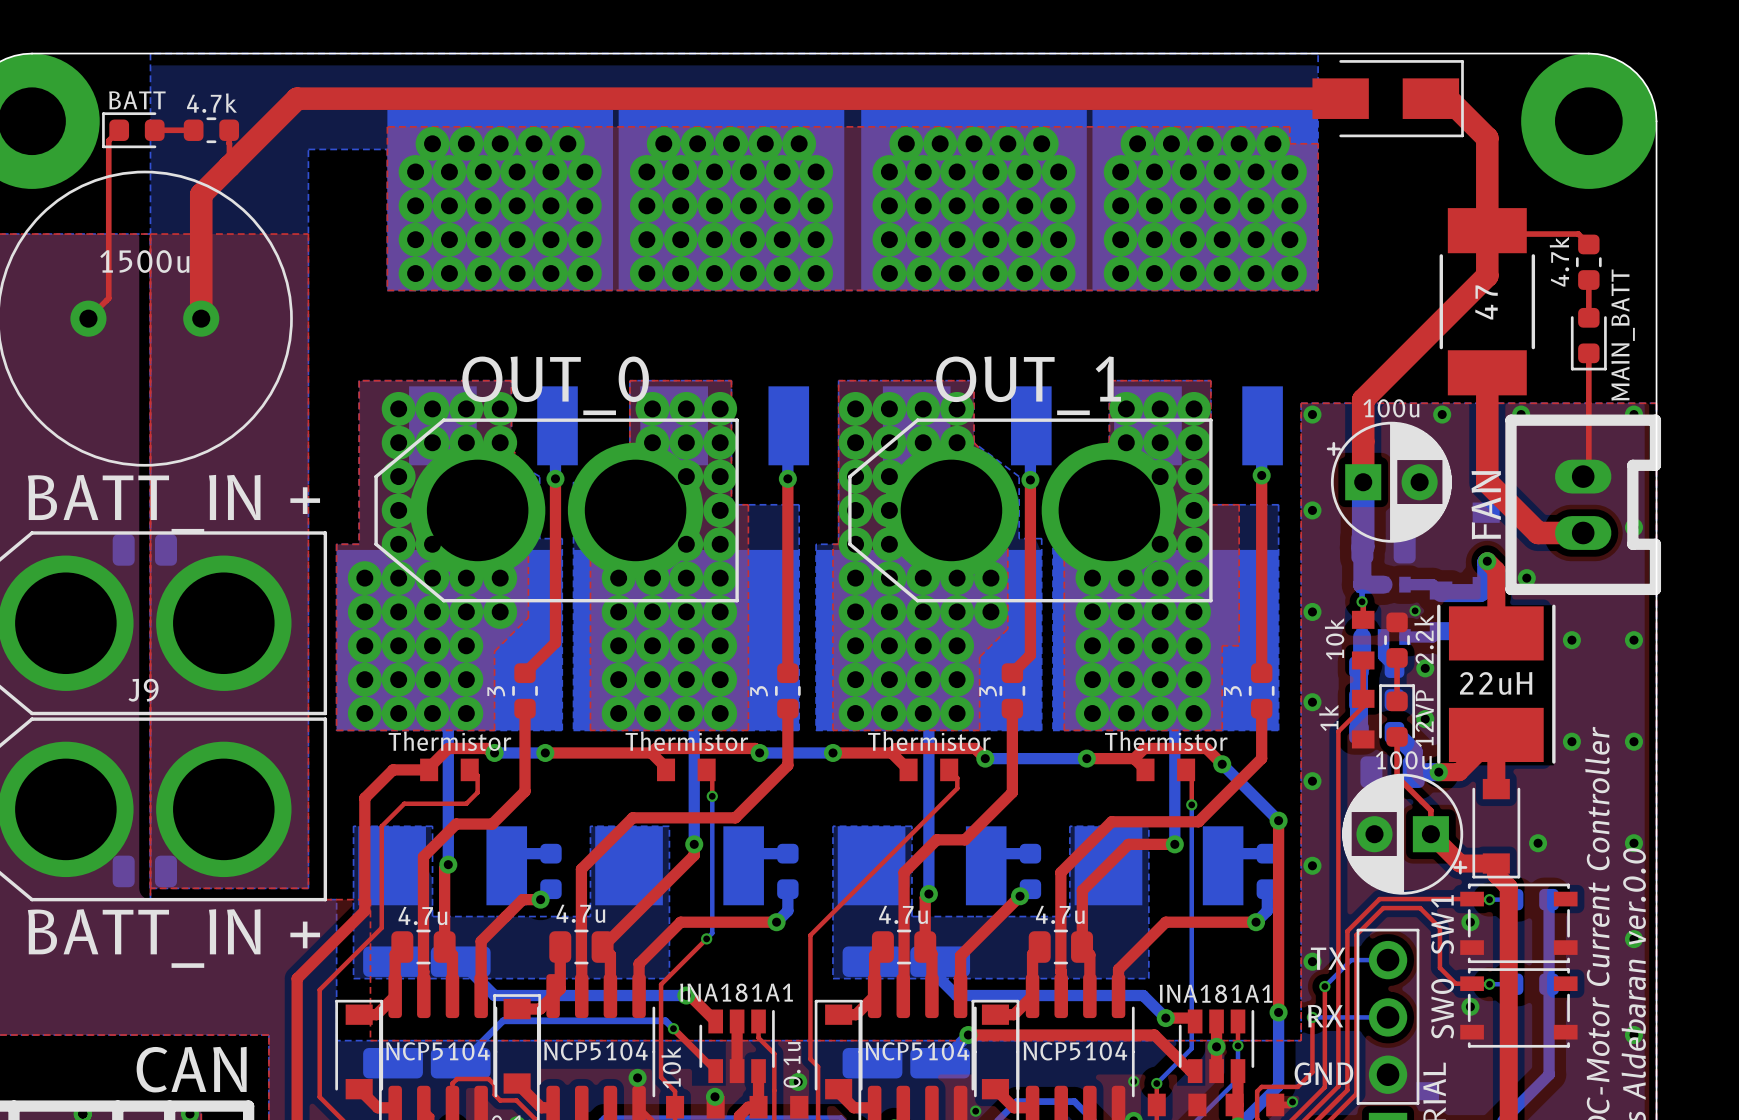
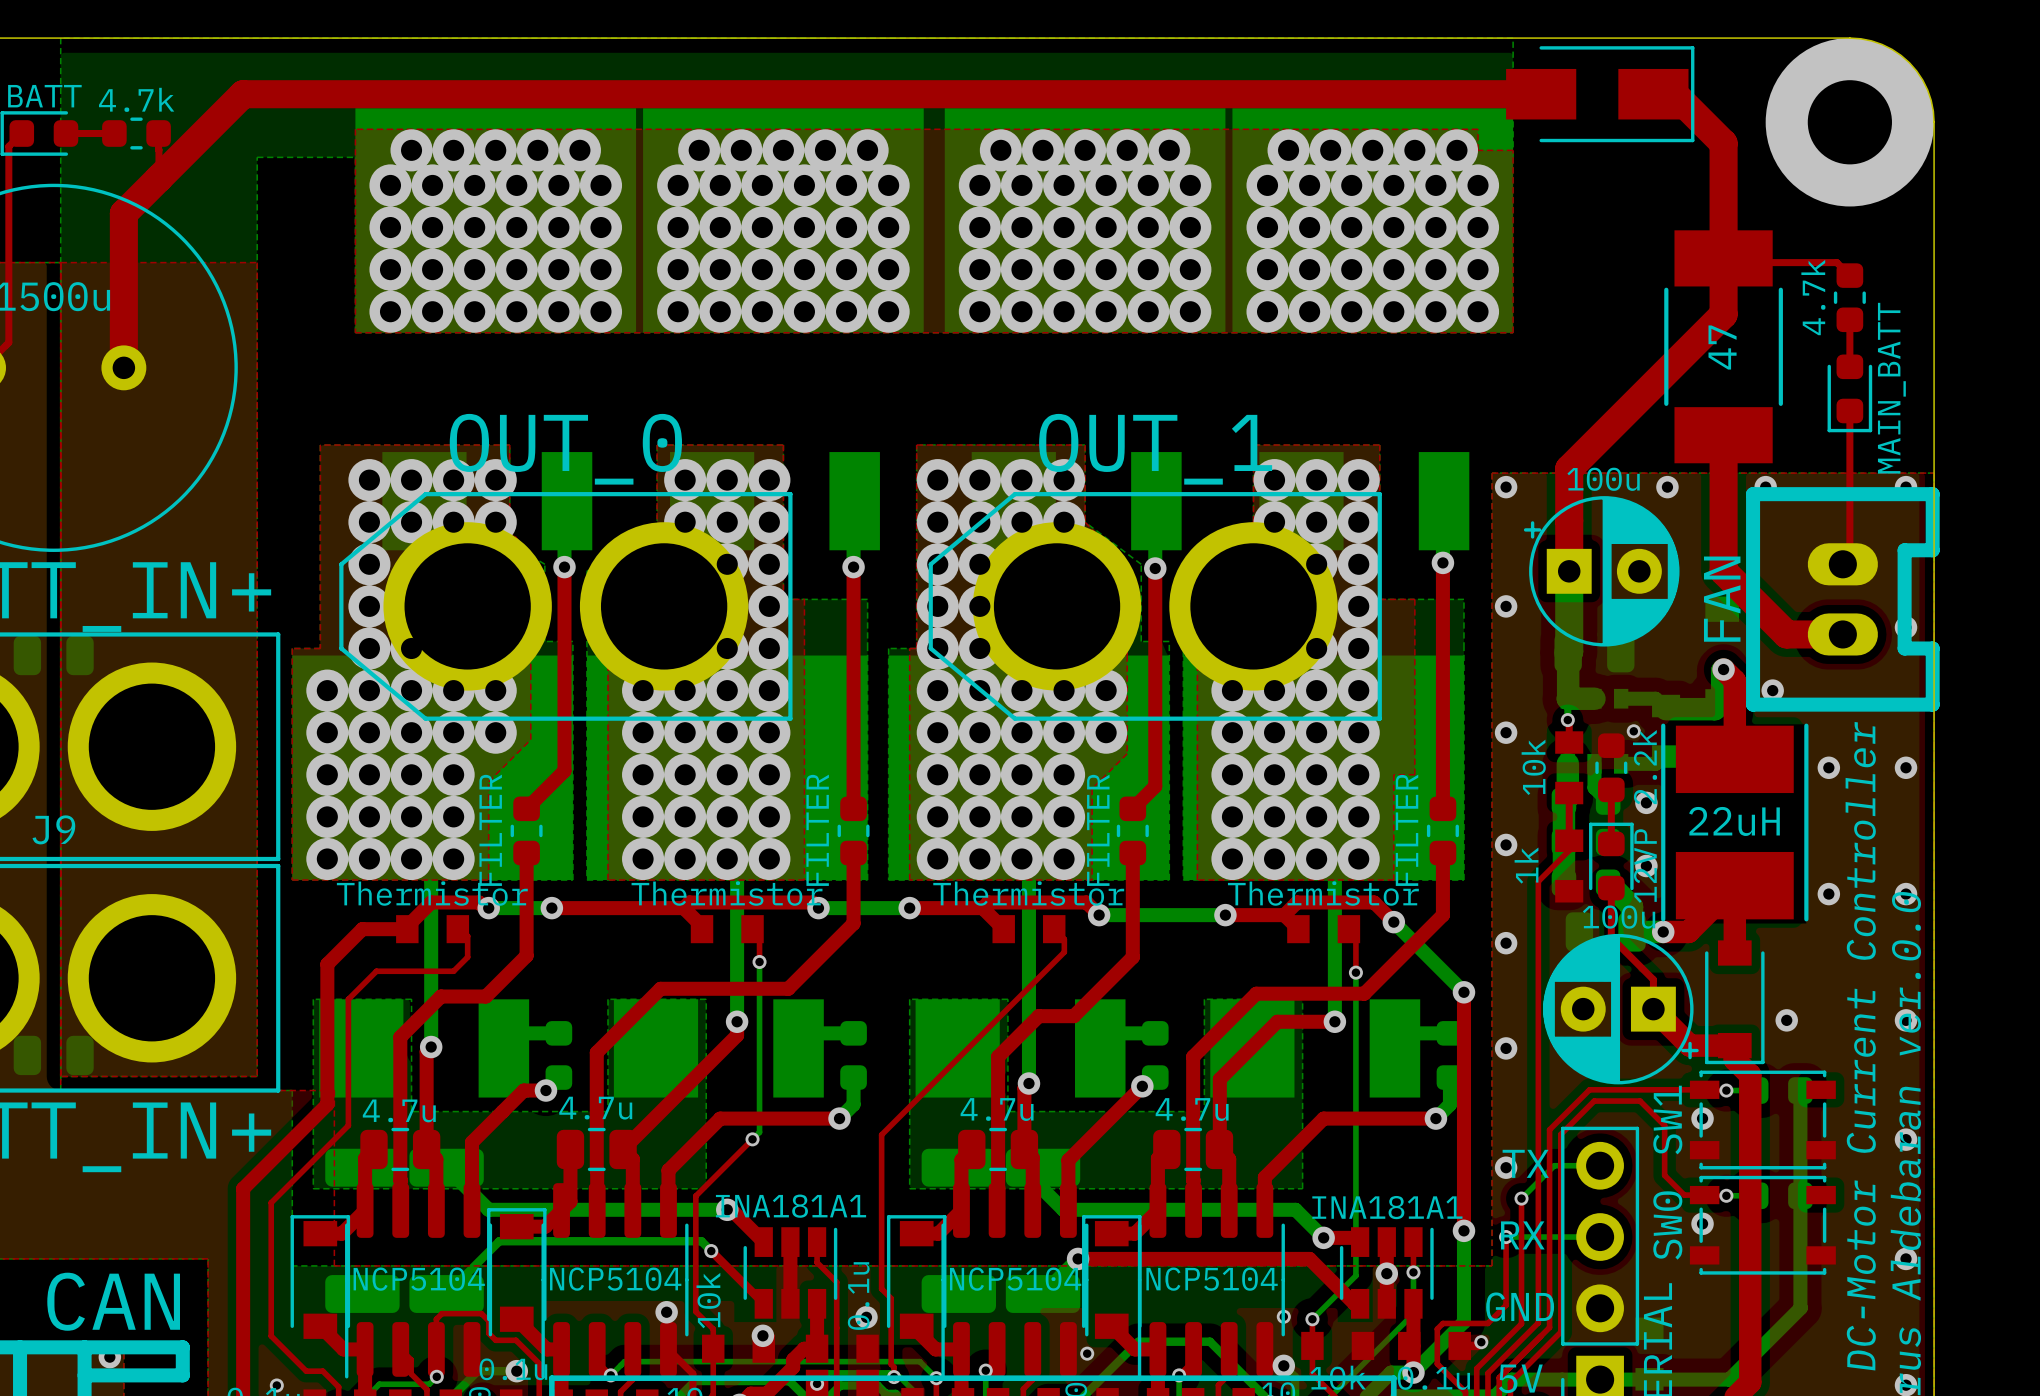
part value: 3 (496, 691) -> FILTER (490, 830)
part value: 3 (759, 691) -> FILTER (817, 830)
part value: 3 (988, 691) -> FILTER (1098, 830)
part value: 3 (1232, 691) -> FILTER (1407, 830)

